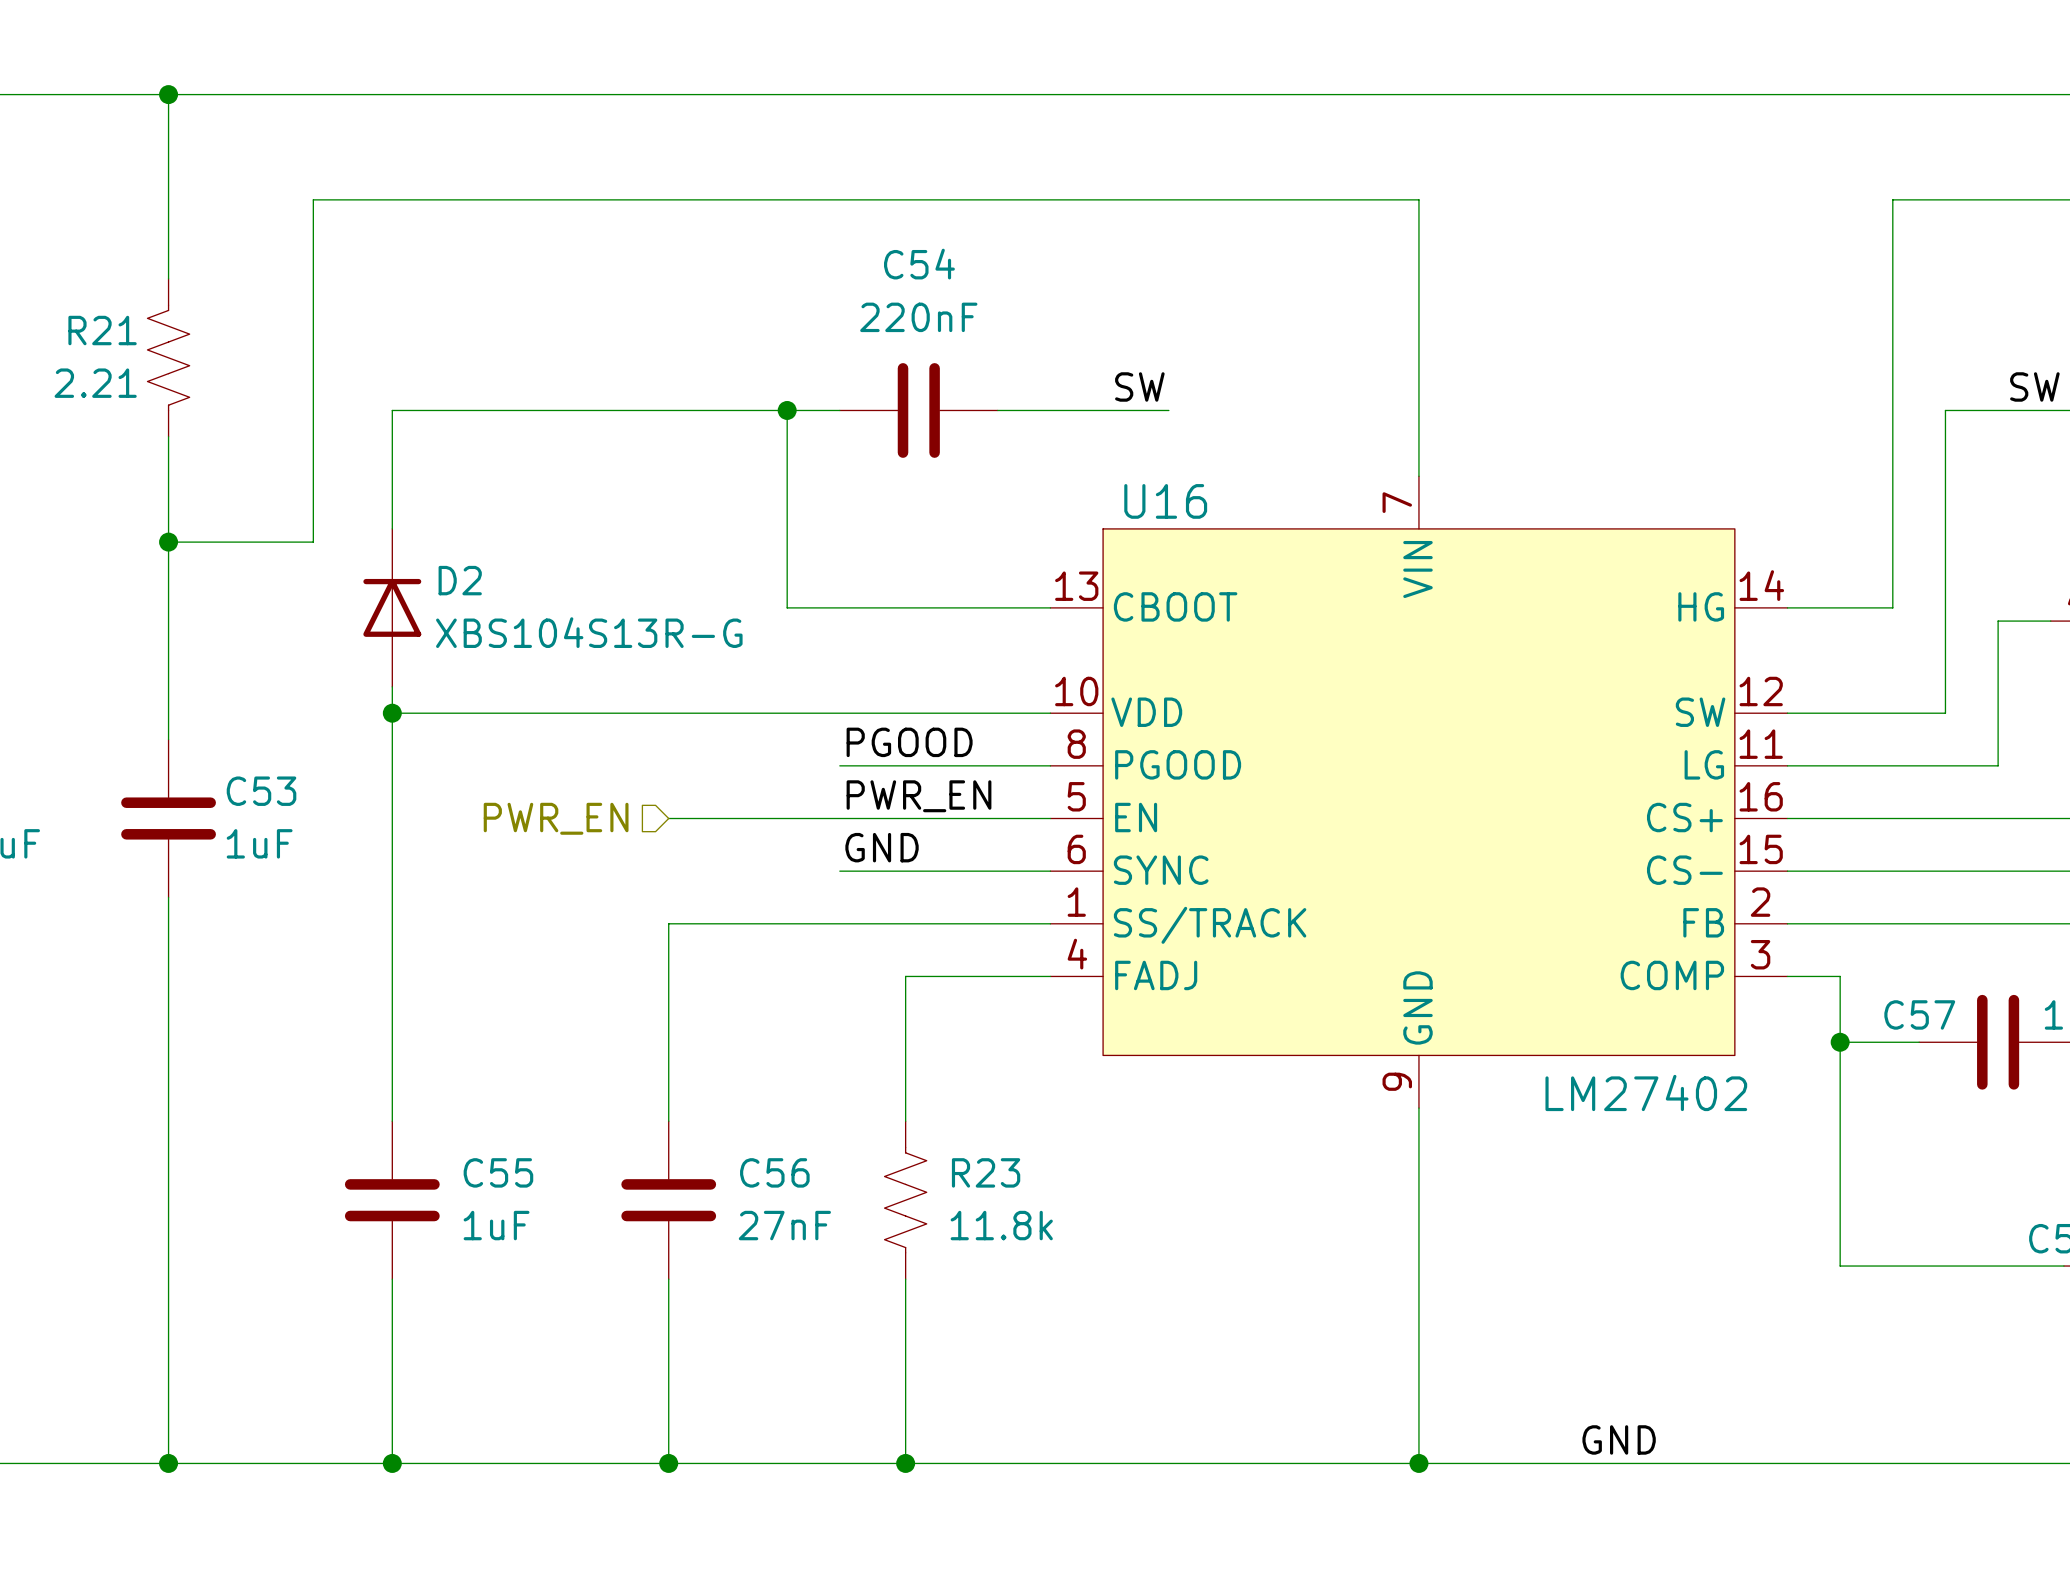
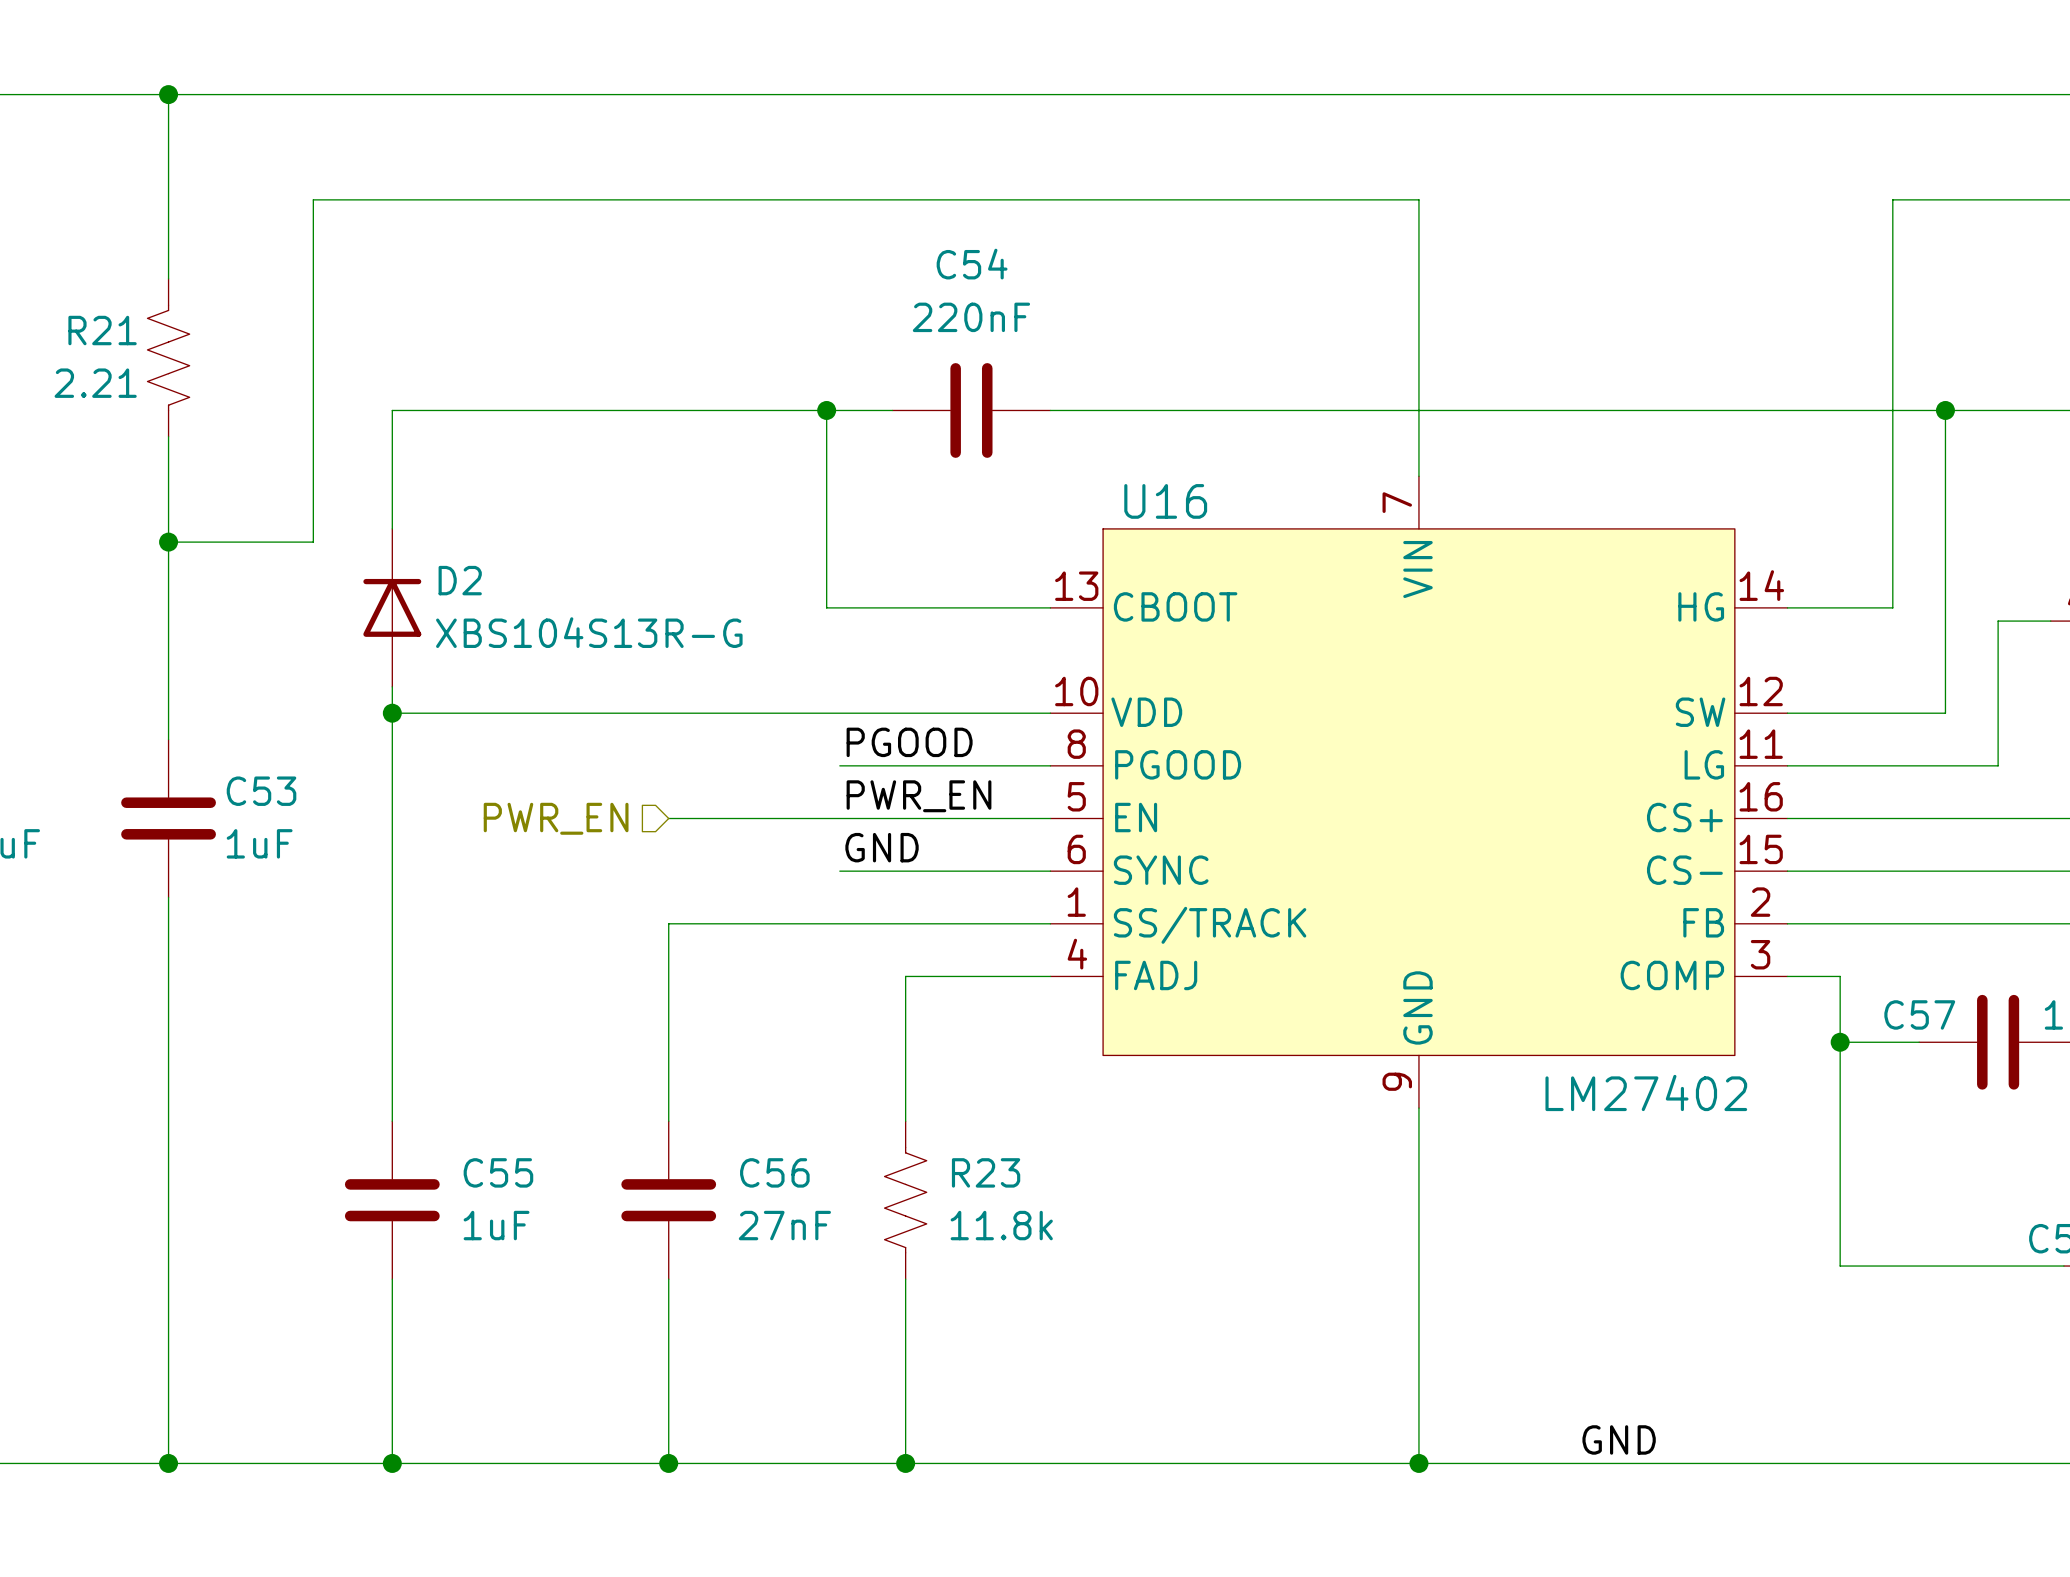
label: SW (1139, 386) -> none
label: SW (2034, 386) -> none
wire: (787, 410) (787, 607) (826, 607) -> (826, 410) (826, 607)
junction position: (787, 410) -> (826, 410)
C54 position: (918, 410) -> (971, 410)
wire: none -> (1168, 410) (1945, 410)
junction: none -> (1945, 410)

